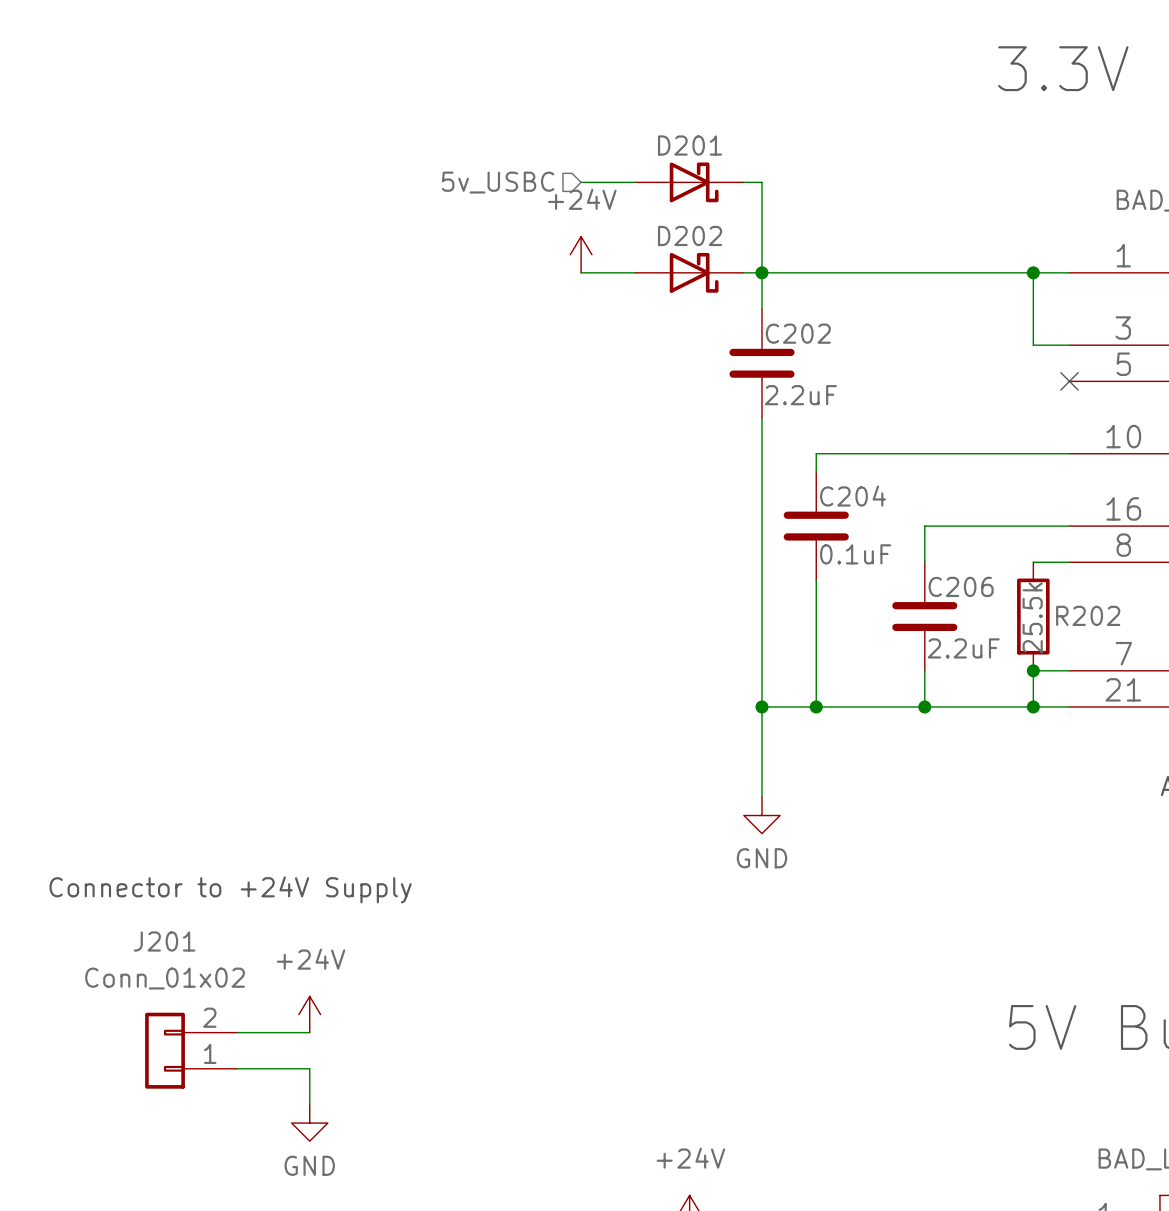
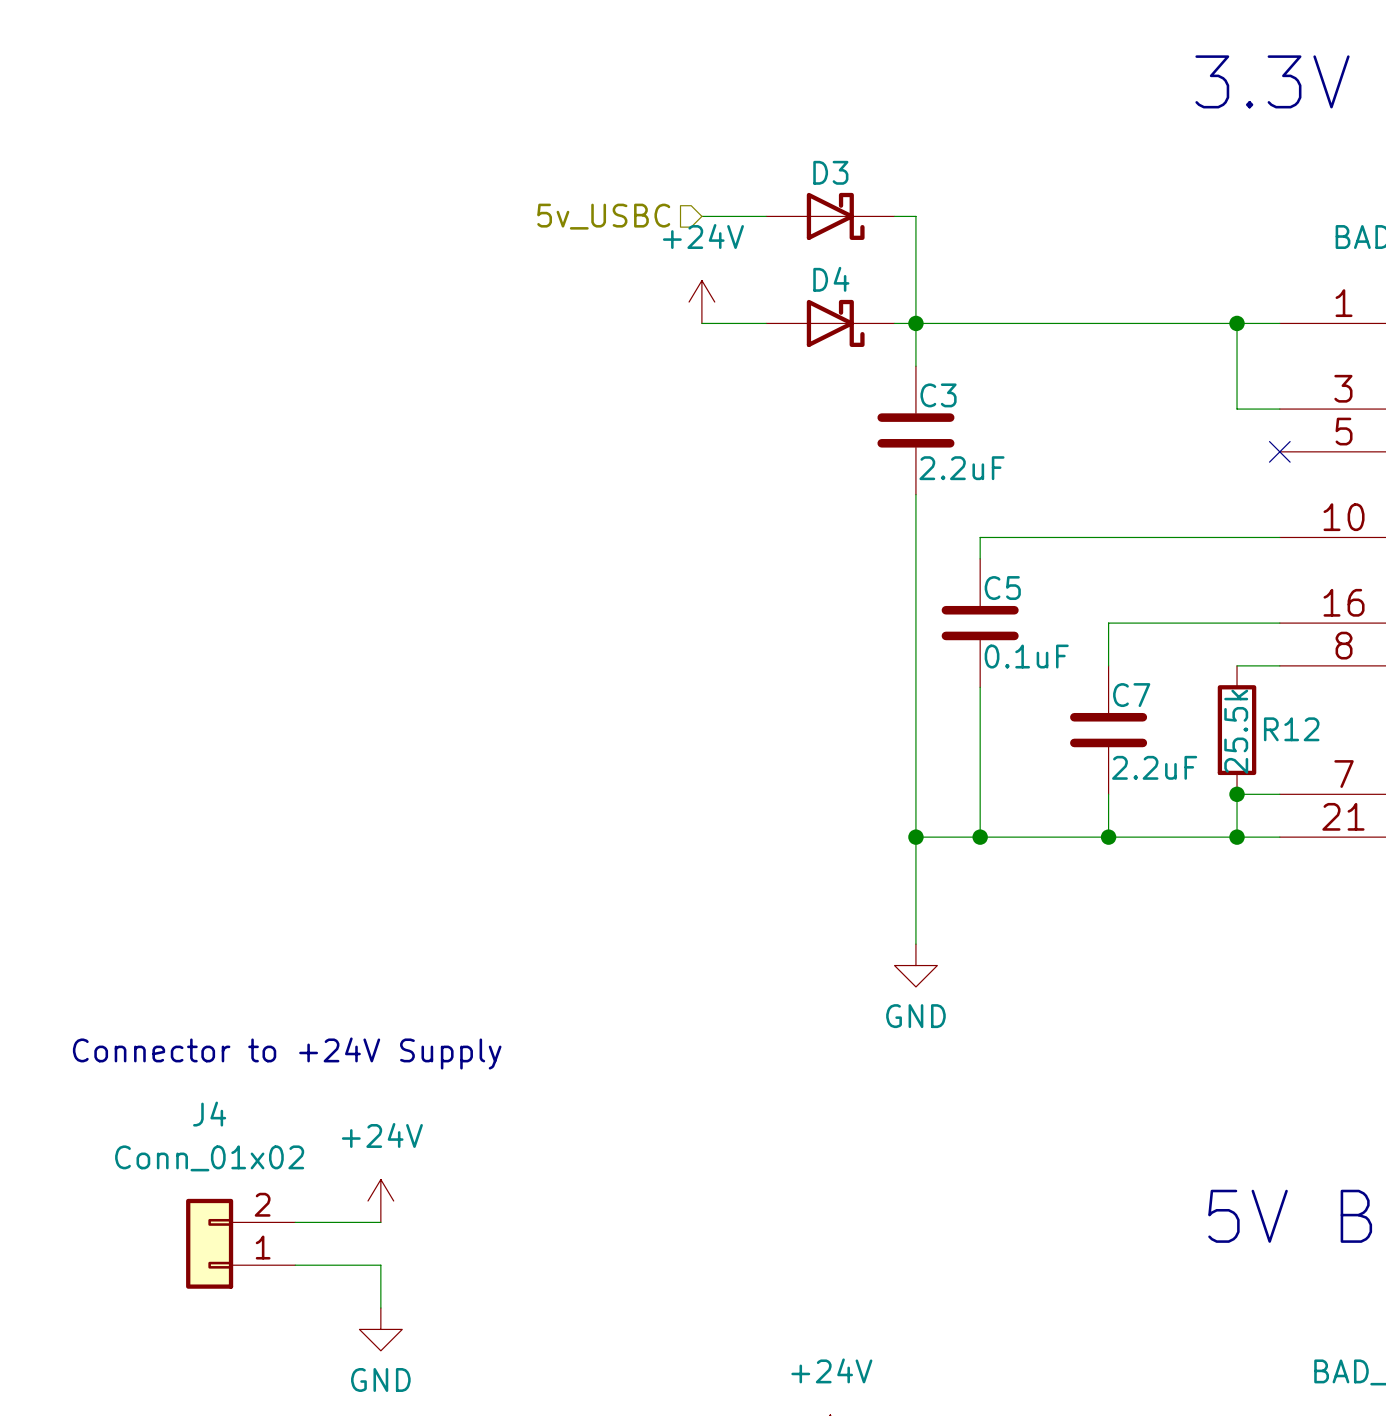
D201 name: D201 (690, 145) -> D3 (830, 172)
D202 name: D202 (690, 235) -> D4 (831, 279)
C202 name: C202 (798, 333) -> C3 (938, 395)
C204 name: C204 (853, 496) -> C5 (1002, 588)
C206 name: C206 (961, 586) -> C7 (1131, 695)
R202 name: R202 (1088, 615) -> R12 (1291, 729)
J201 name: J201 (164, 941) -> J4 (209, 1114)

